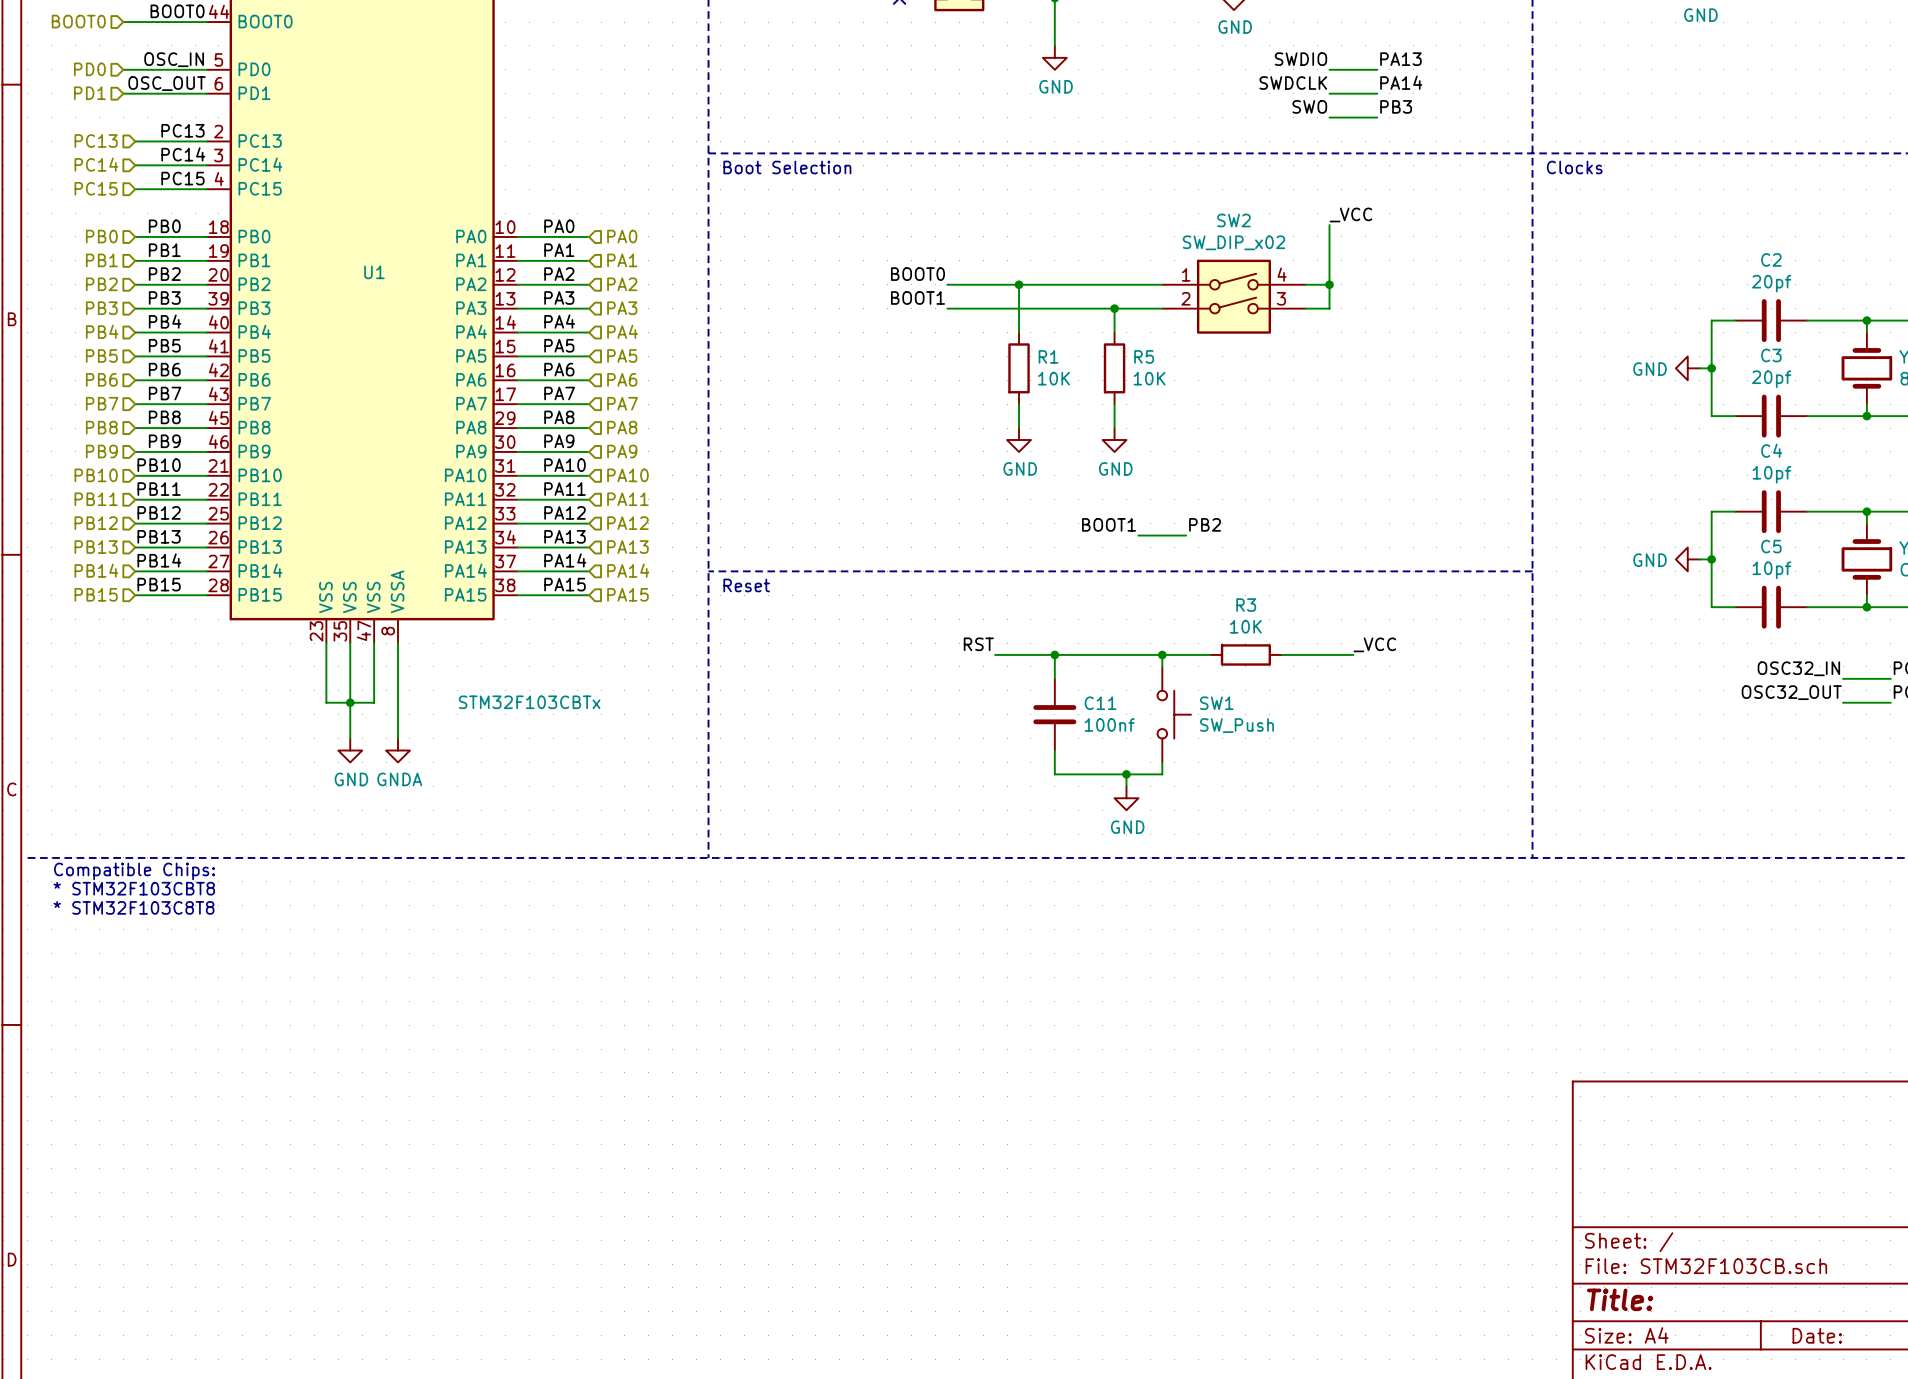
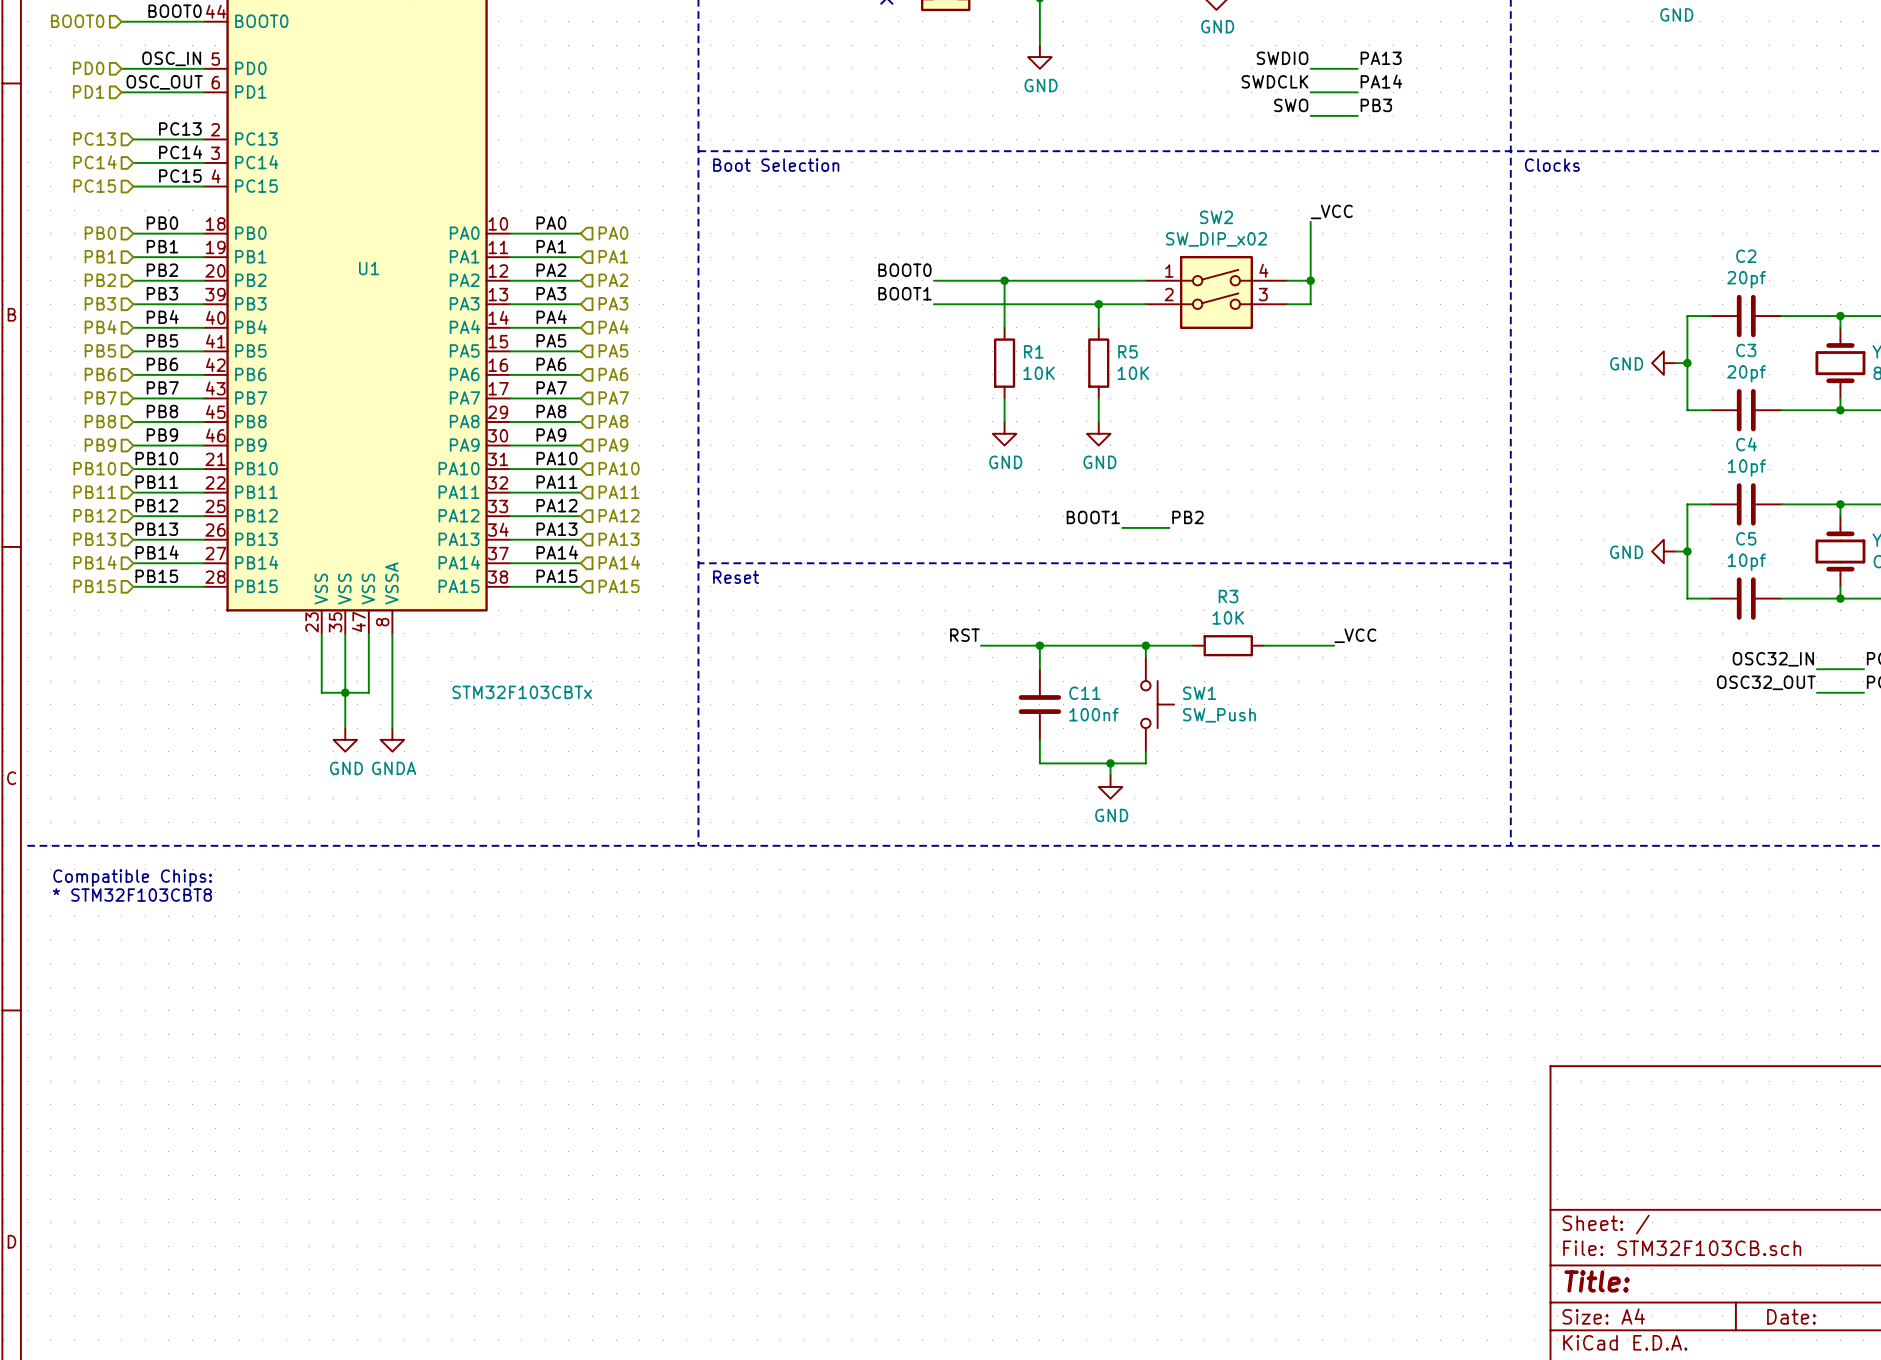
text: Compatible Chips: (134, 871) -> none
text: * STM32F103CBT8 (134, 888) -> Compatible Chips: (132, 878)
text: * STM32F103C8T8 (133, 907) -> * STM32F103CBT8 (132, 895)

